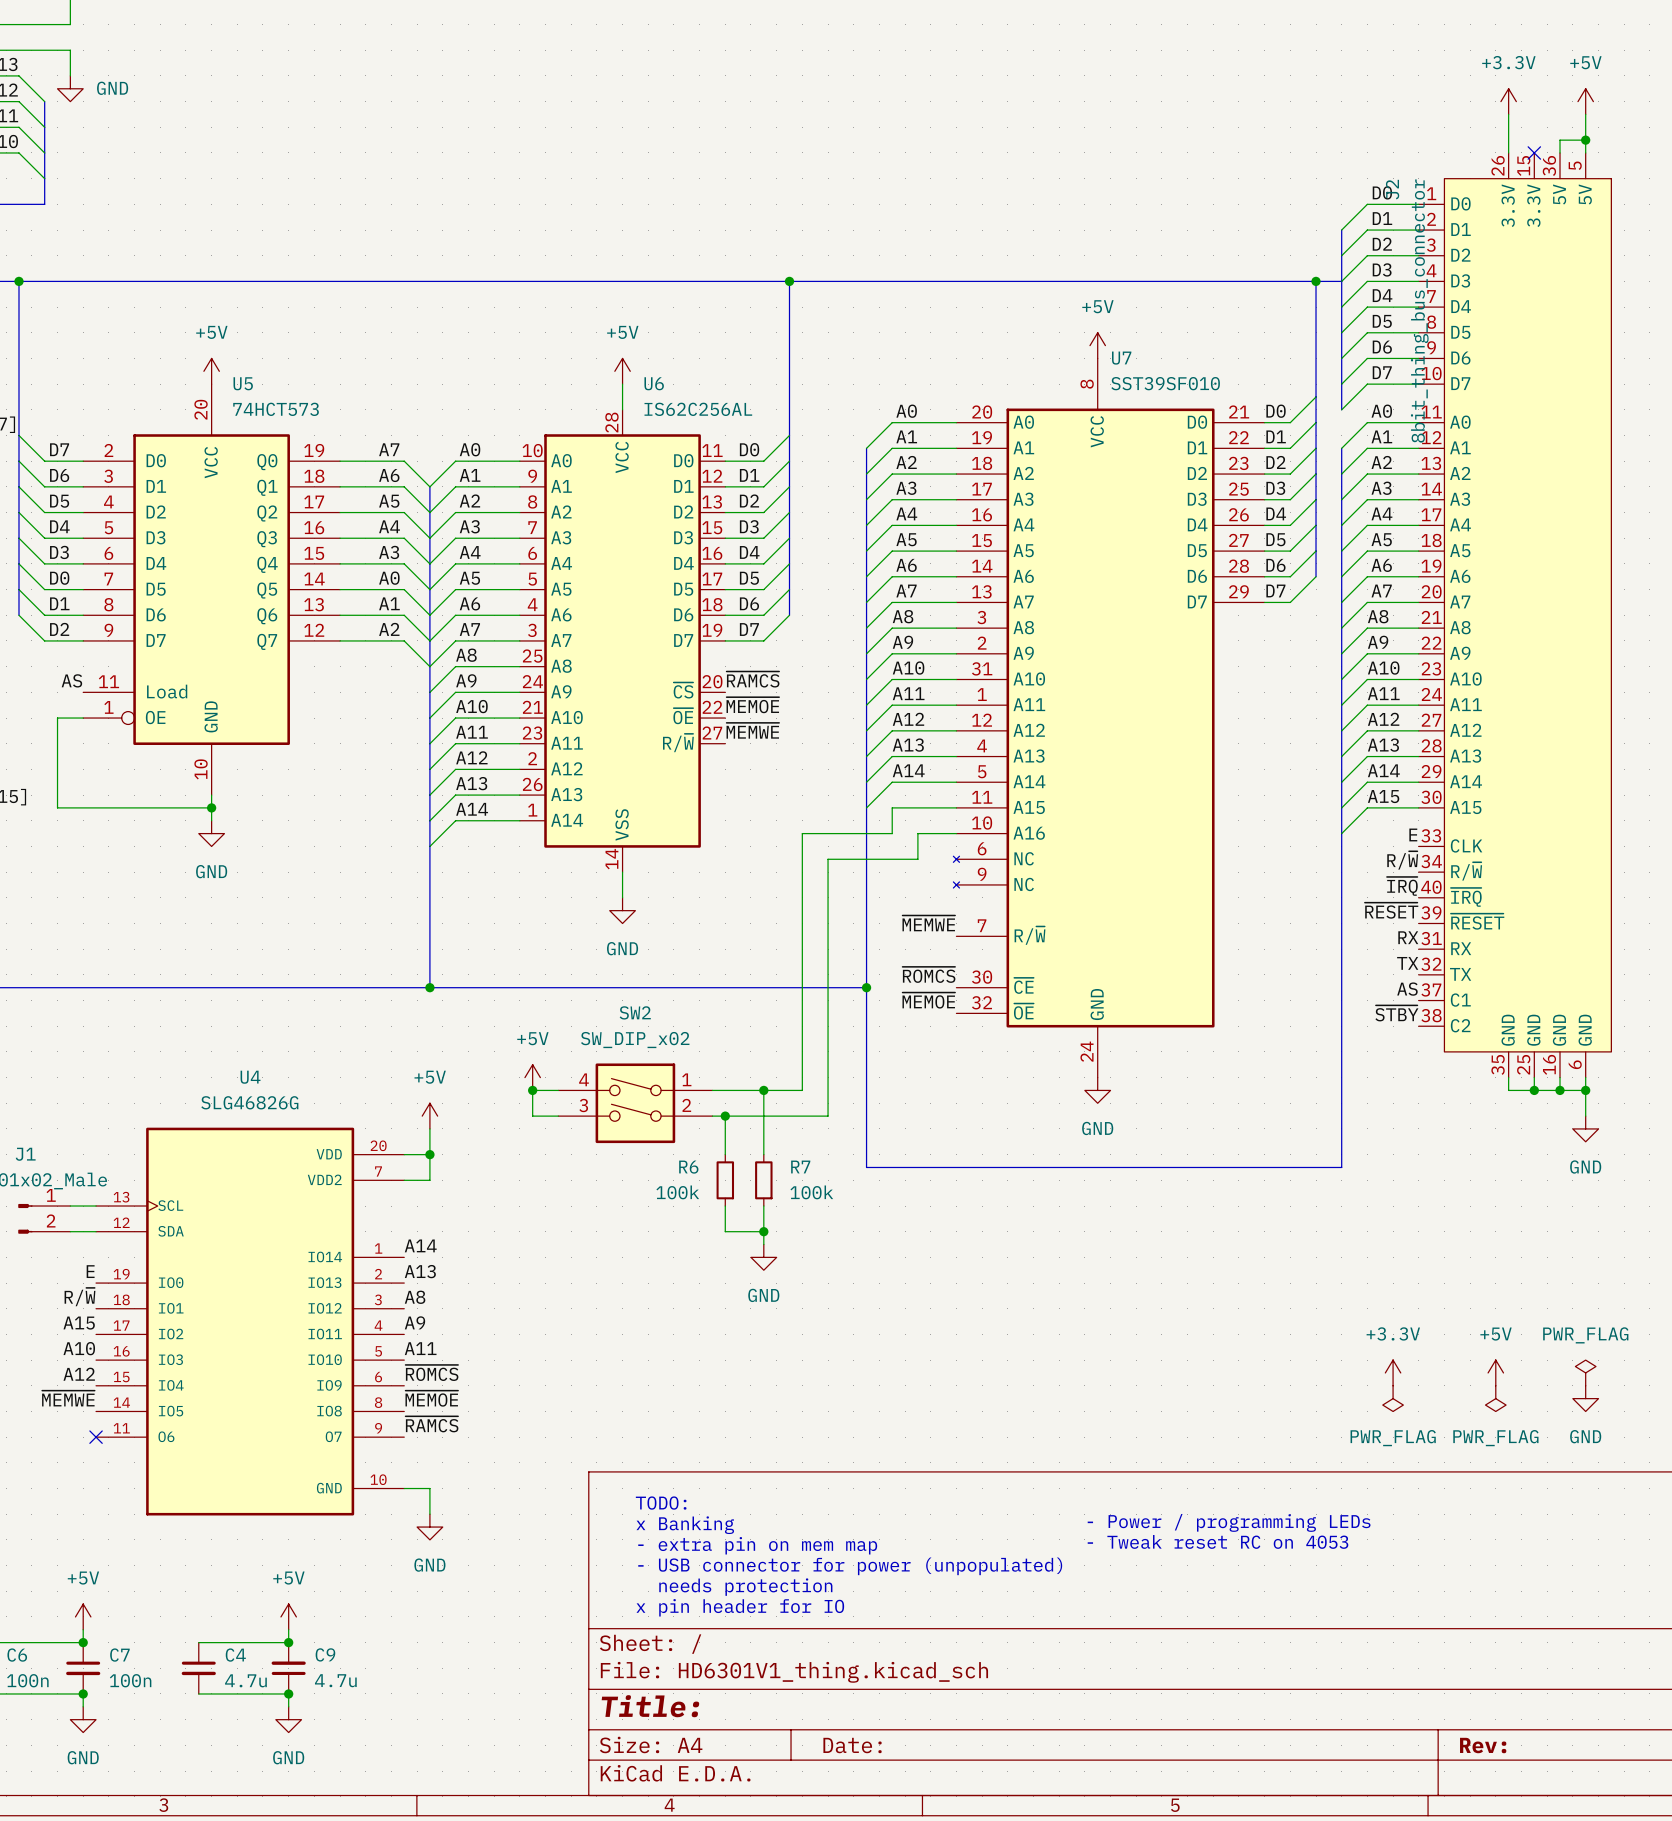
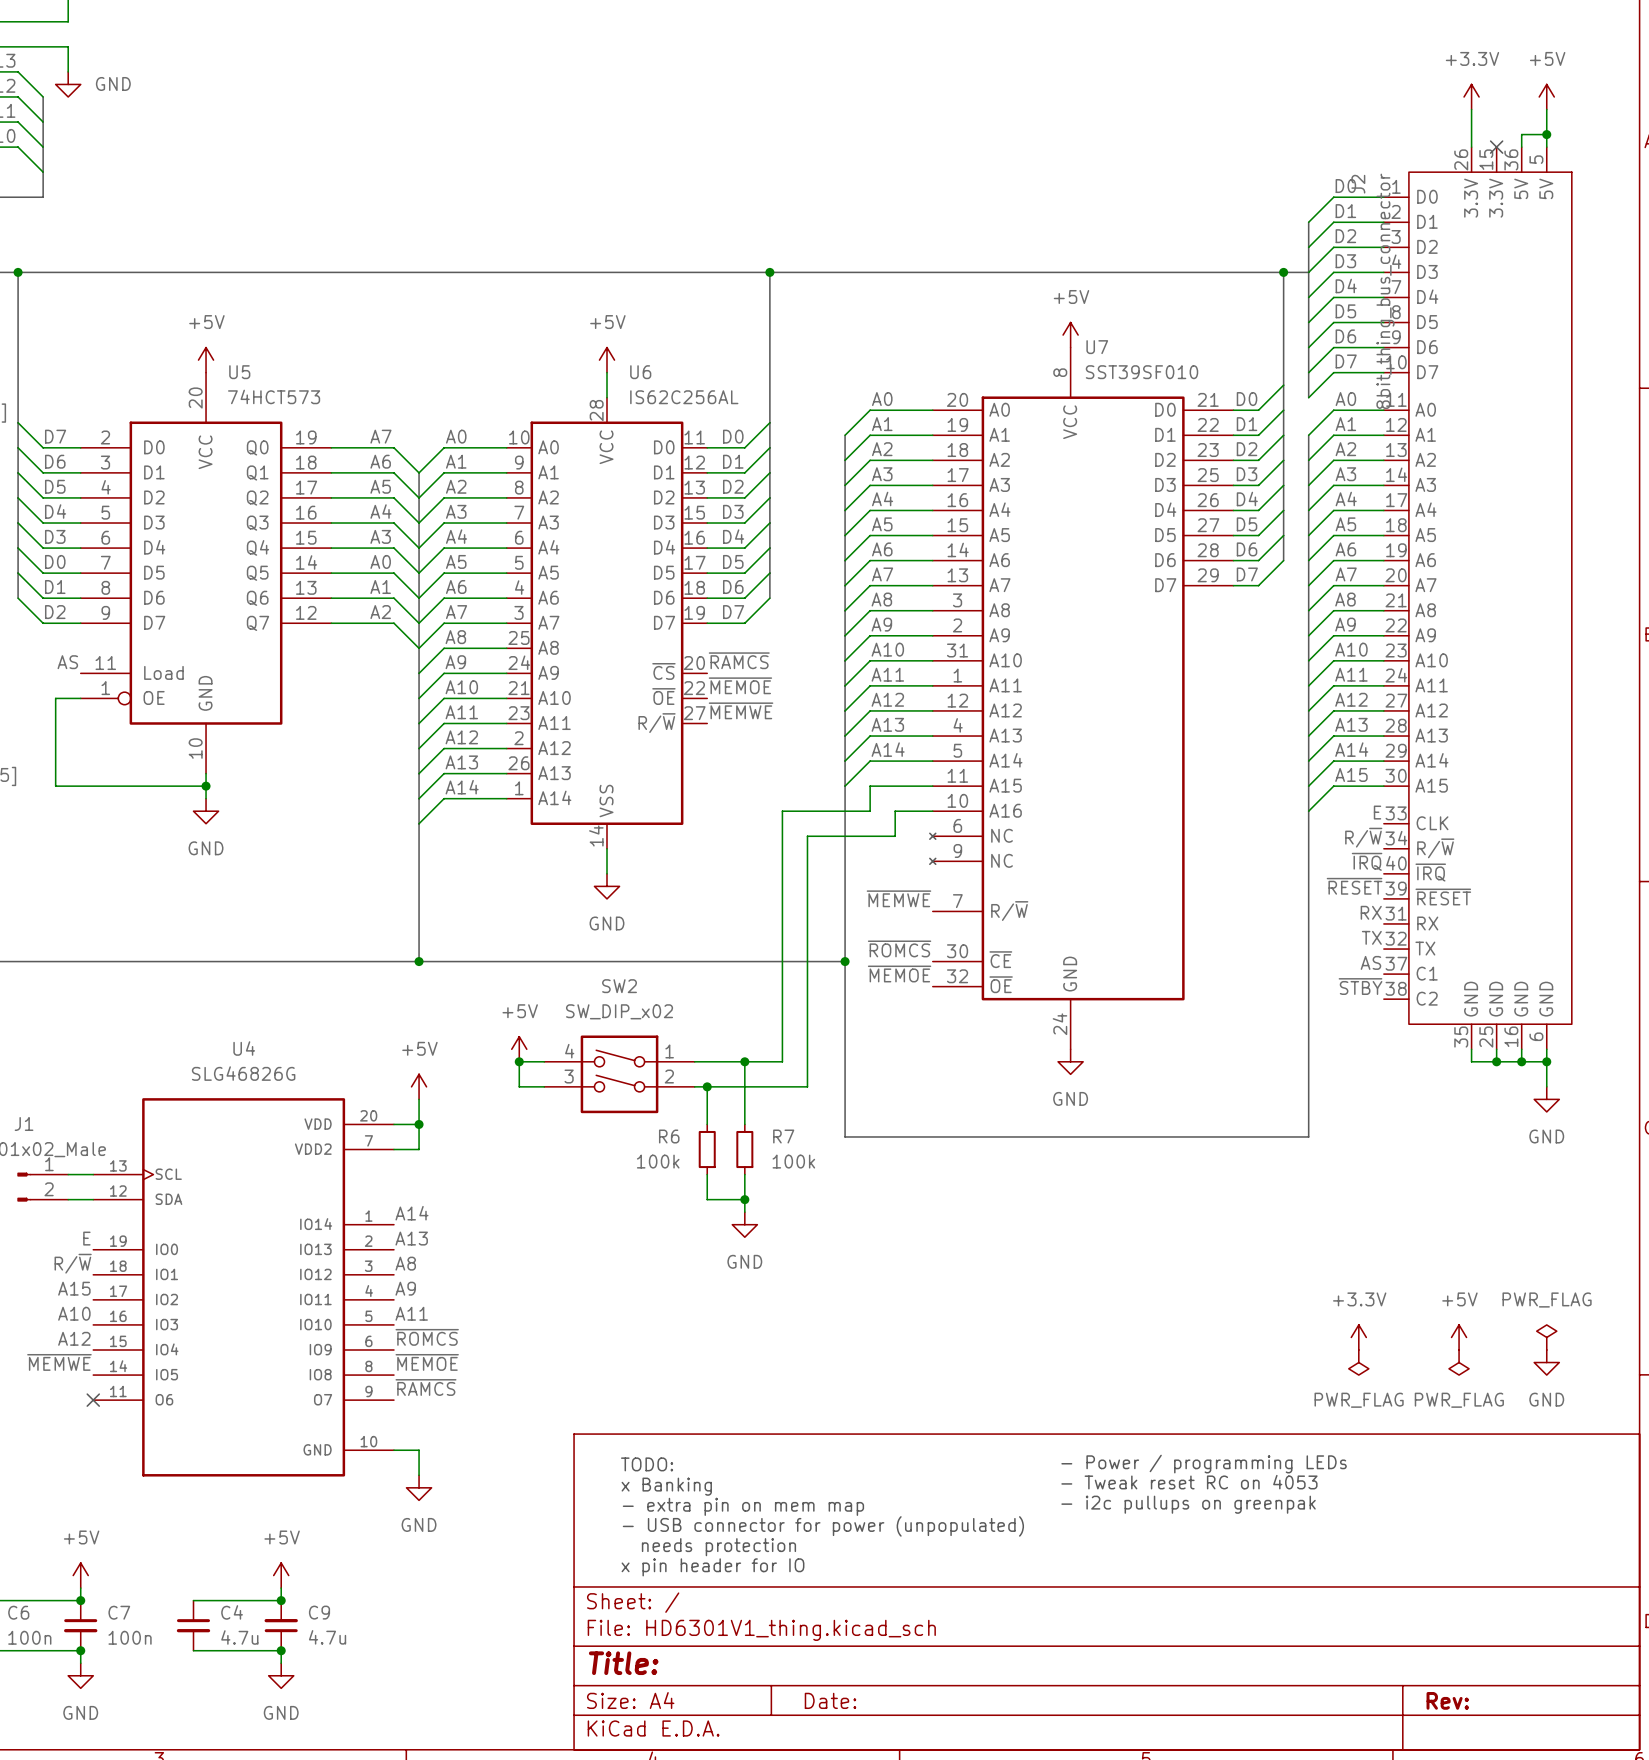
text: none -> - Power / programming LEDs (1204, 1464)
text: - Power / programming LEDs (1229, 1522) -> - Tweak reset RC on 4053 (1189, 1482)
text: - Tweak reset RC on 4053 (1218, 1541) -> - i2c pullups on greenpak (1188, 1504)

